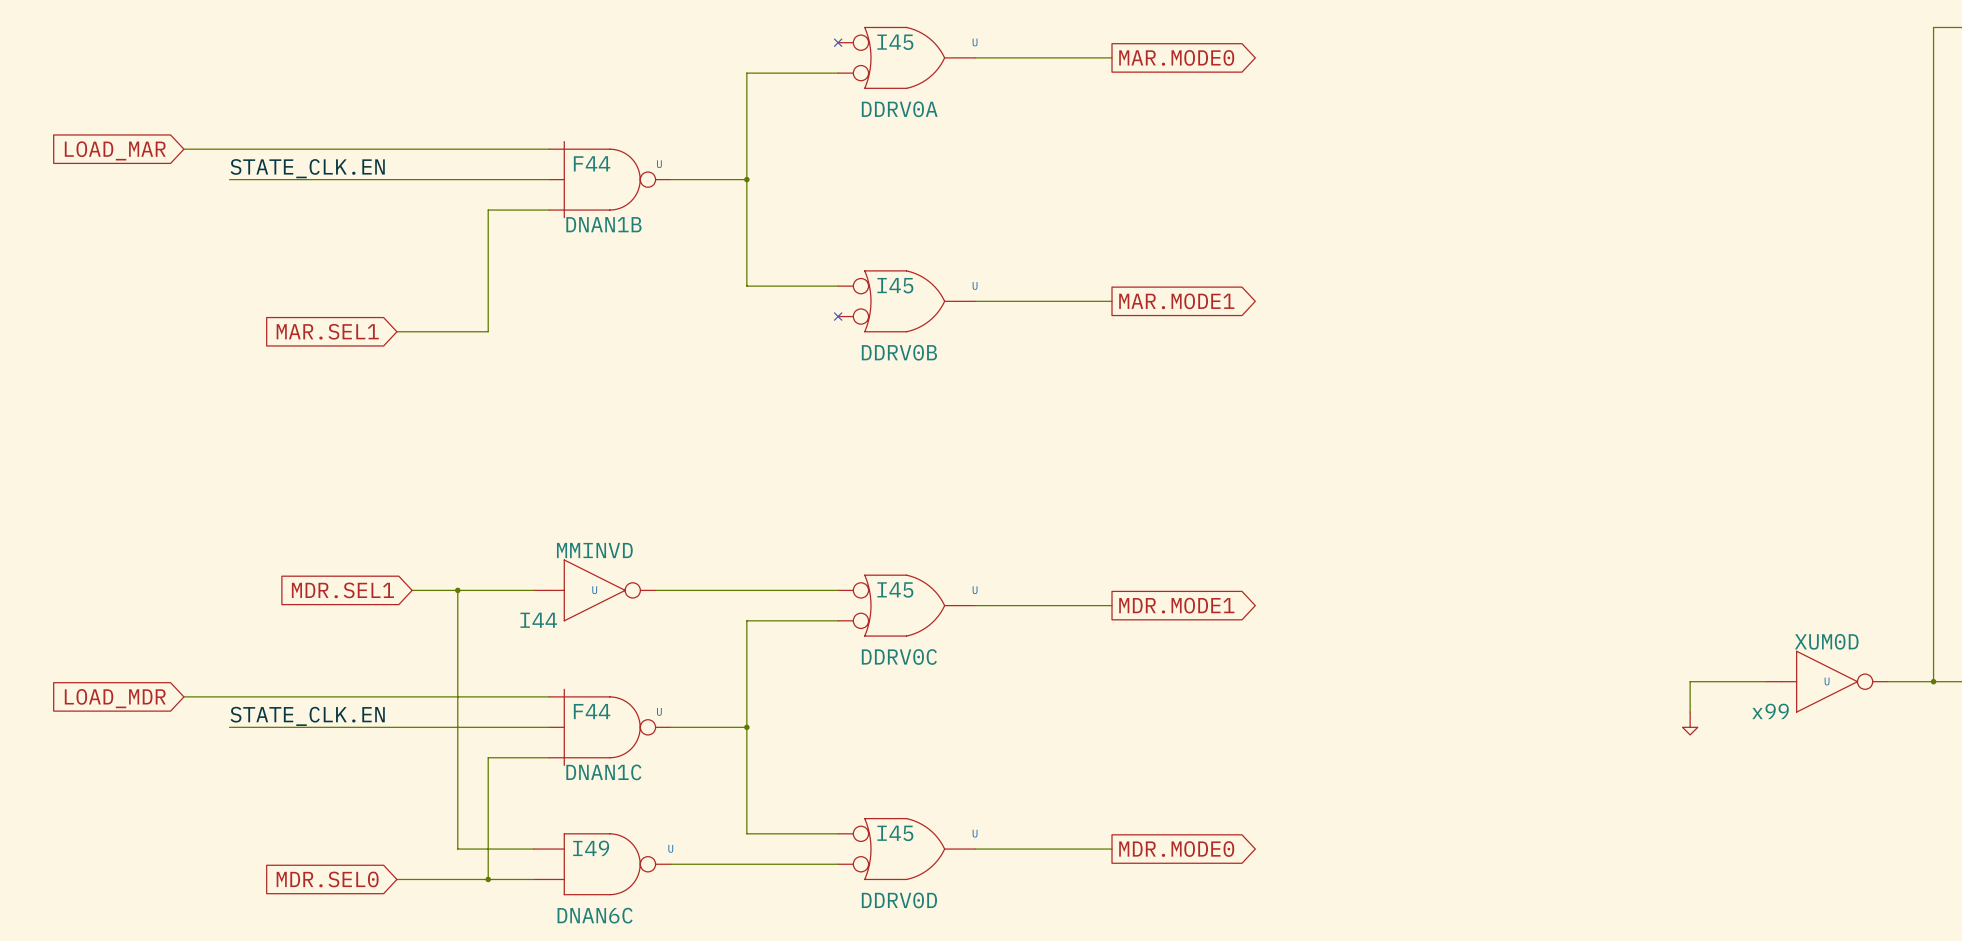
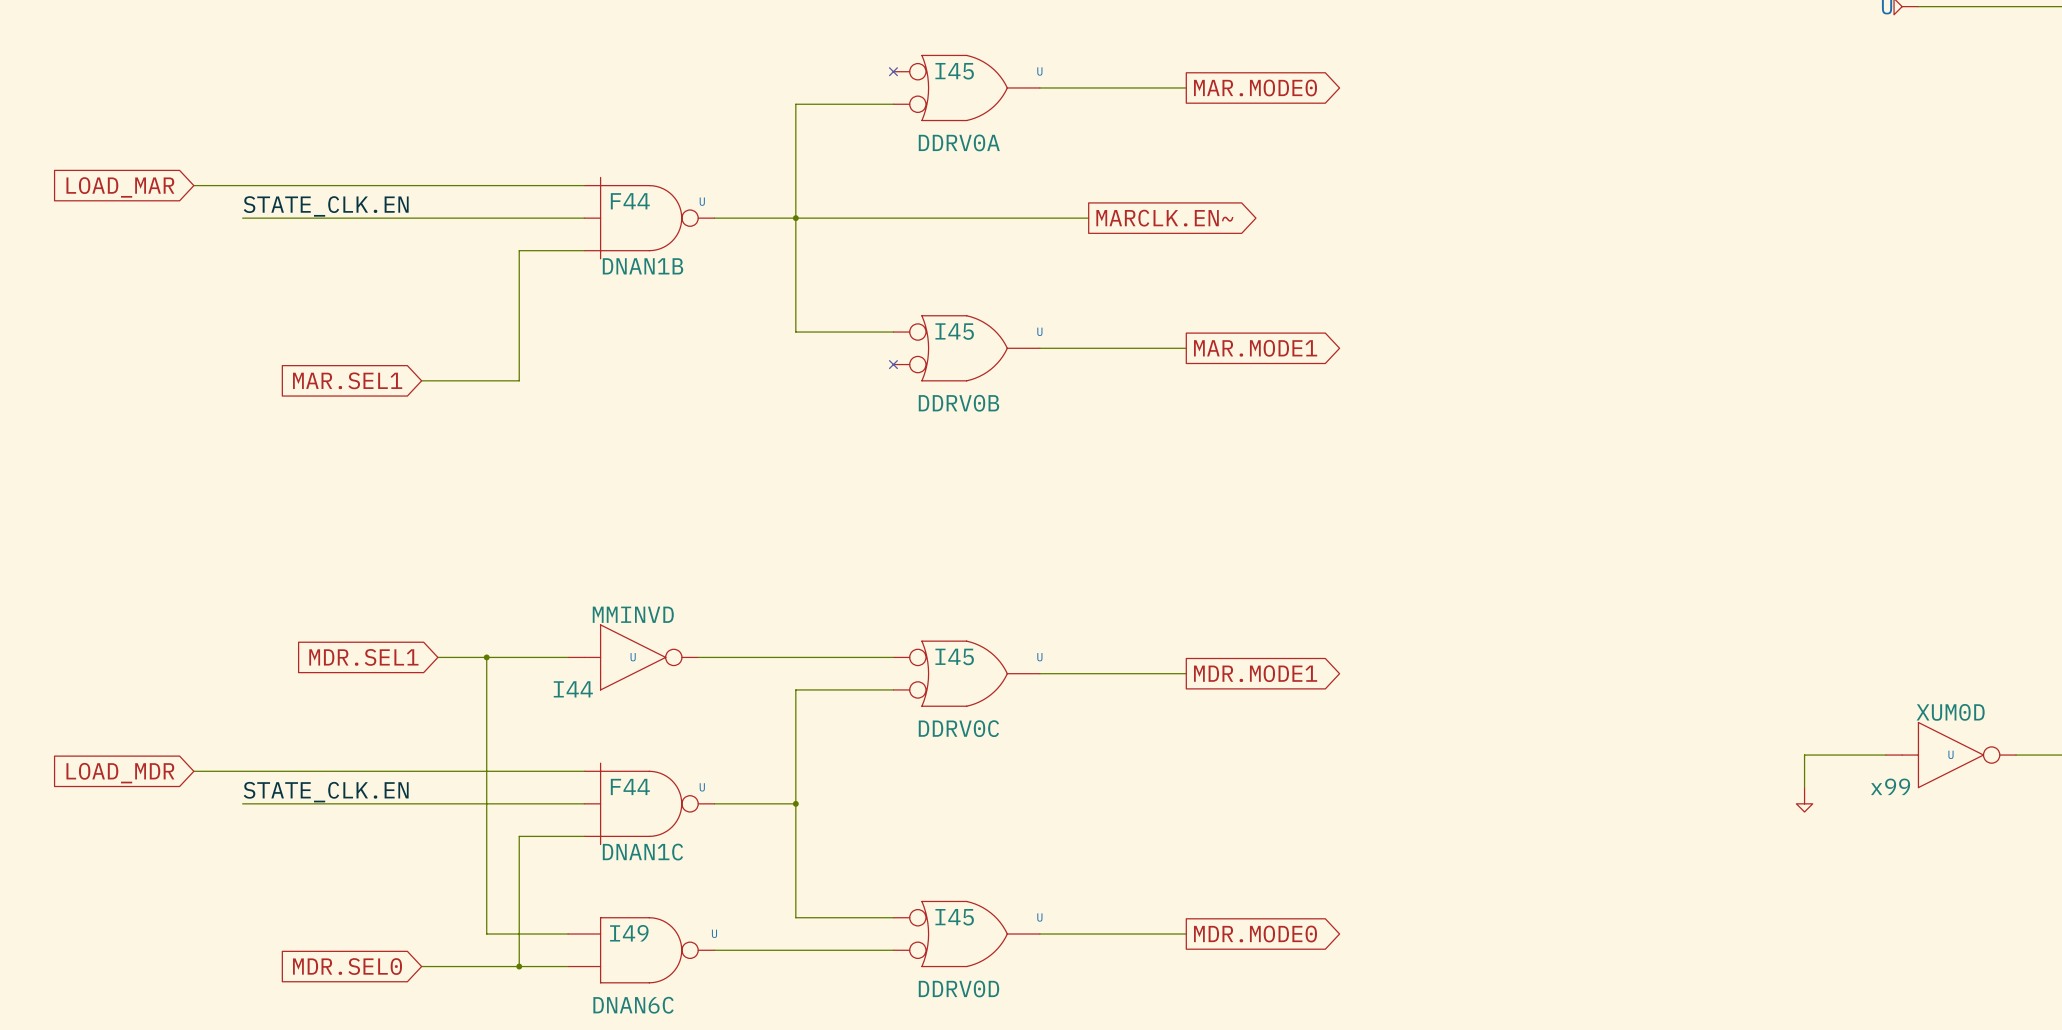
wire: none -> (795, 218) (1088, 218)
global label: none -> MARCLK.EN~ (1164, 218)

